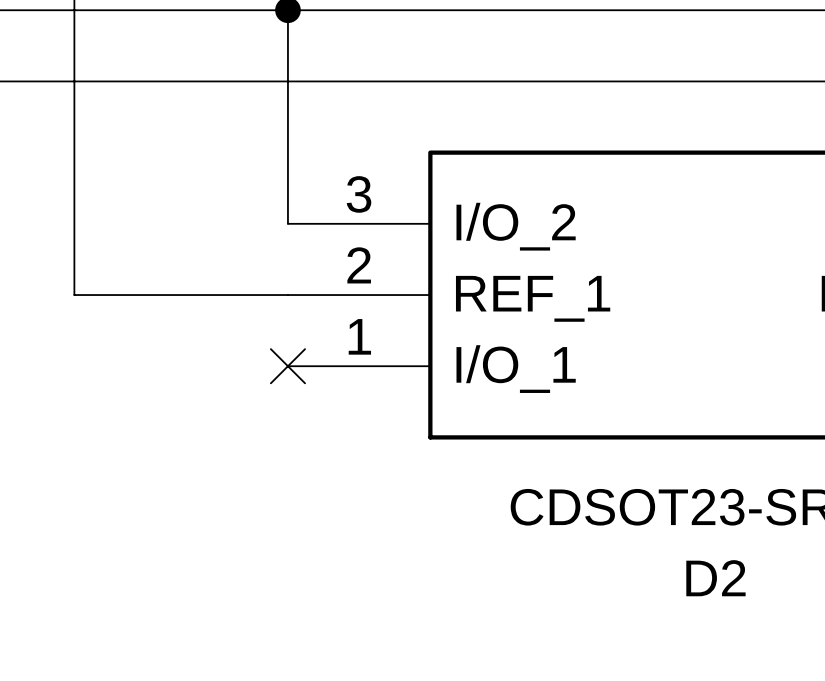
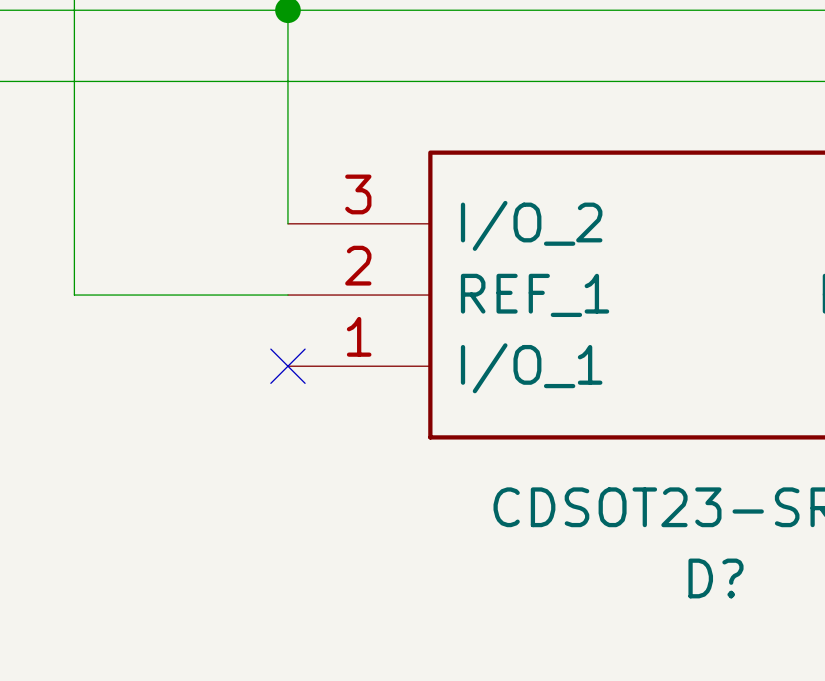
D2 name: D2 (715, 578) -> D? (715, 578)

